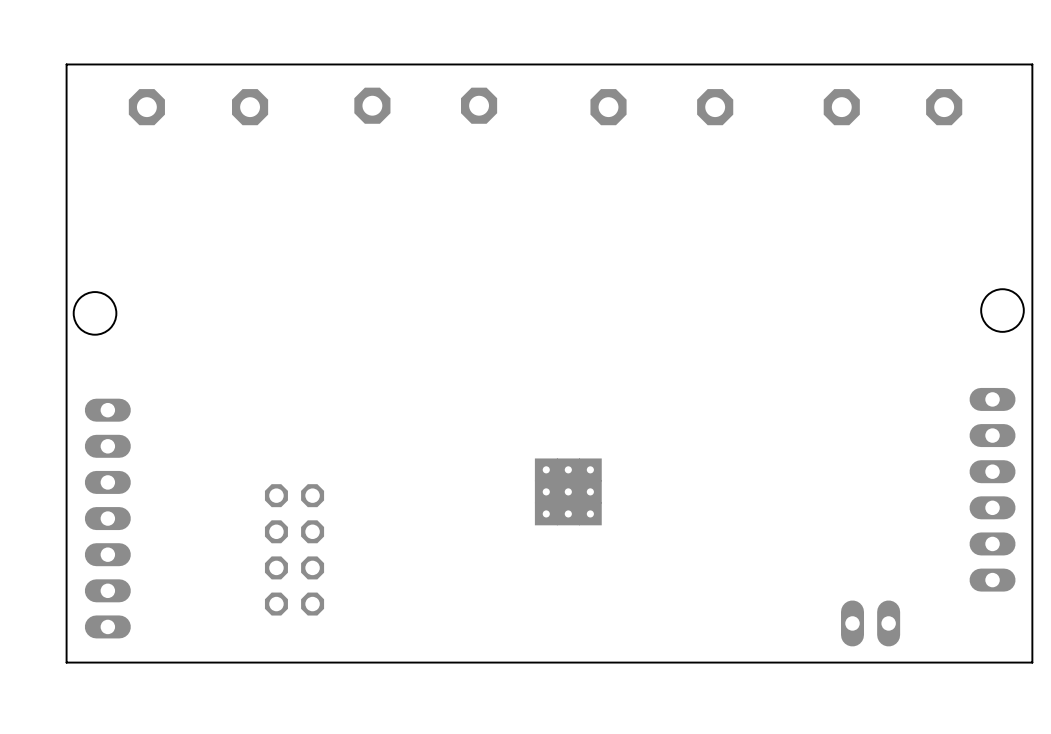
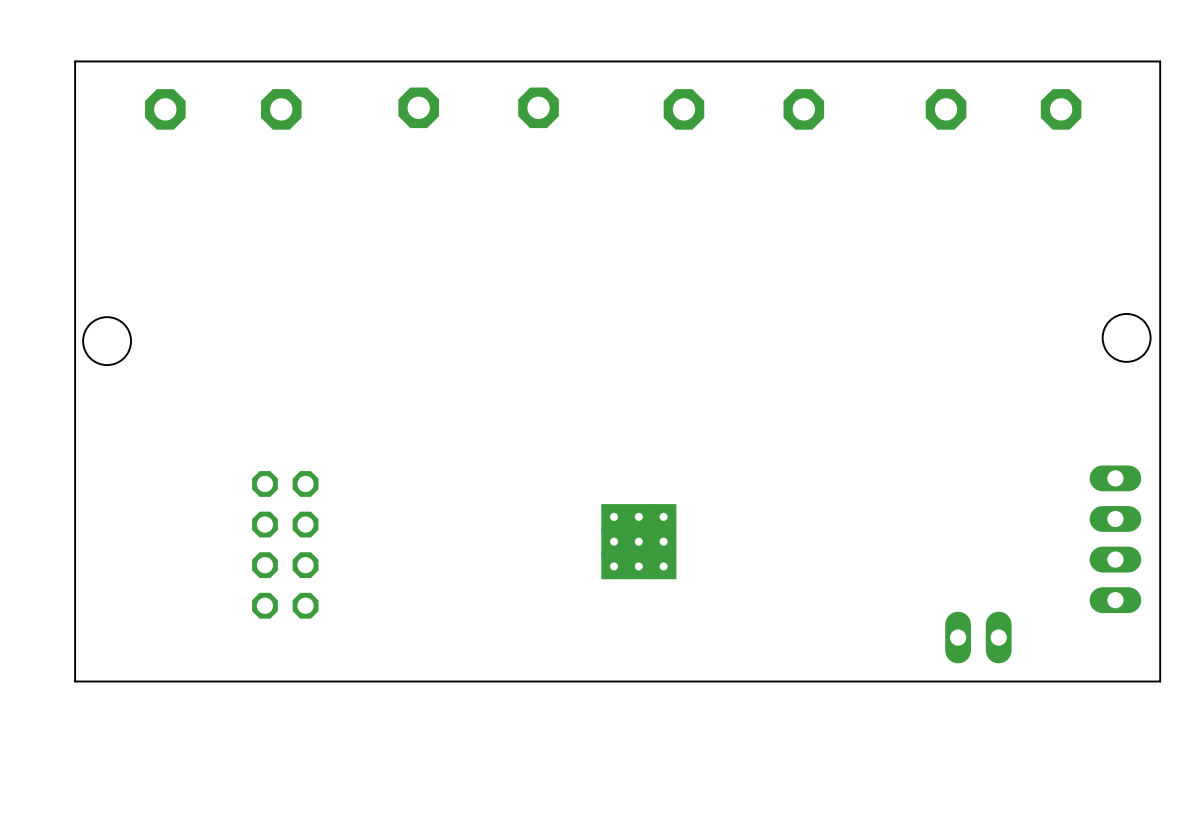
part footprint: [969, 387, 1016, 592] -> [1089, 465, 1142, 614]
part: (107, 518) -> none
part position: (294, 549) -> (285, 544)
board edge: (1032, 616) (1032, 662) (66, 662) (66, 616) -> (1160, 681) (75, 681)
part position: (870, 623) -> (978, 637)

